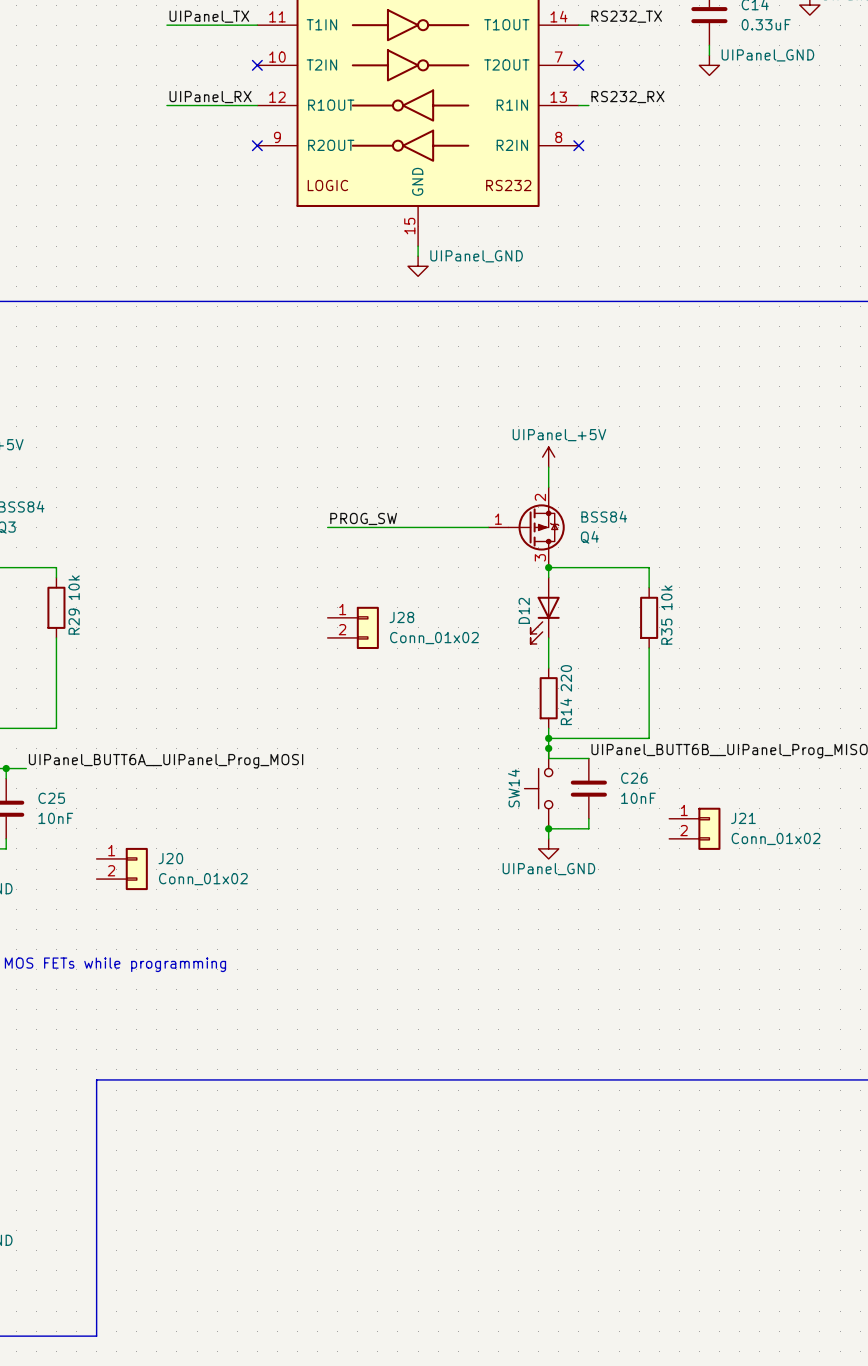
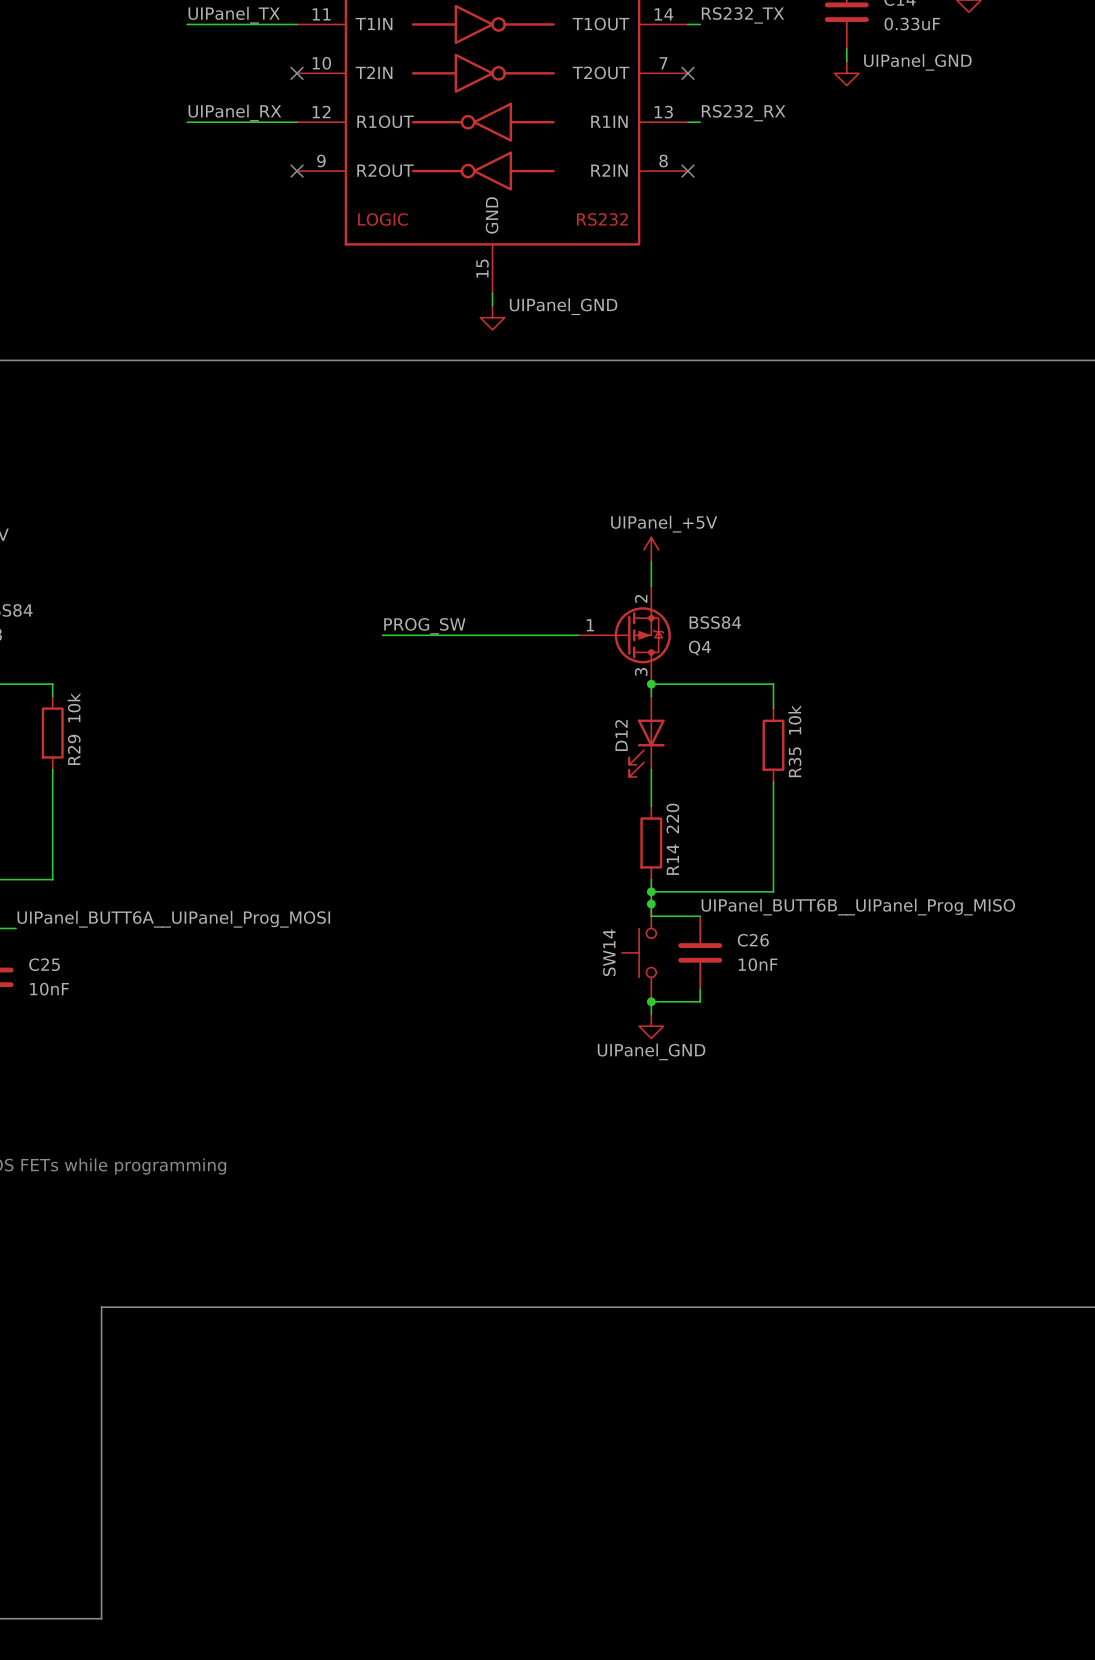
J28: Conn_01x02 (353, 627) -> none
J21: Conn_01x02 (694, 828) -> none
J20: Conn_01x02 (122, 869) -> none

